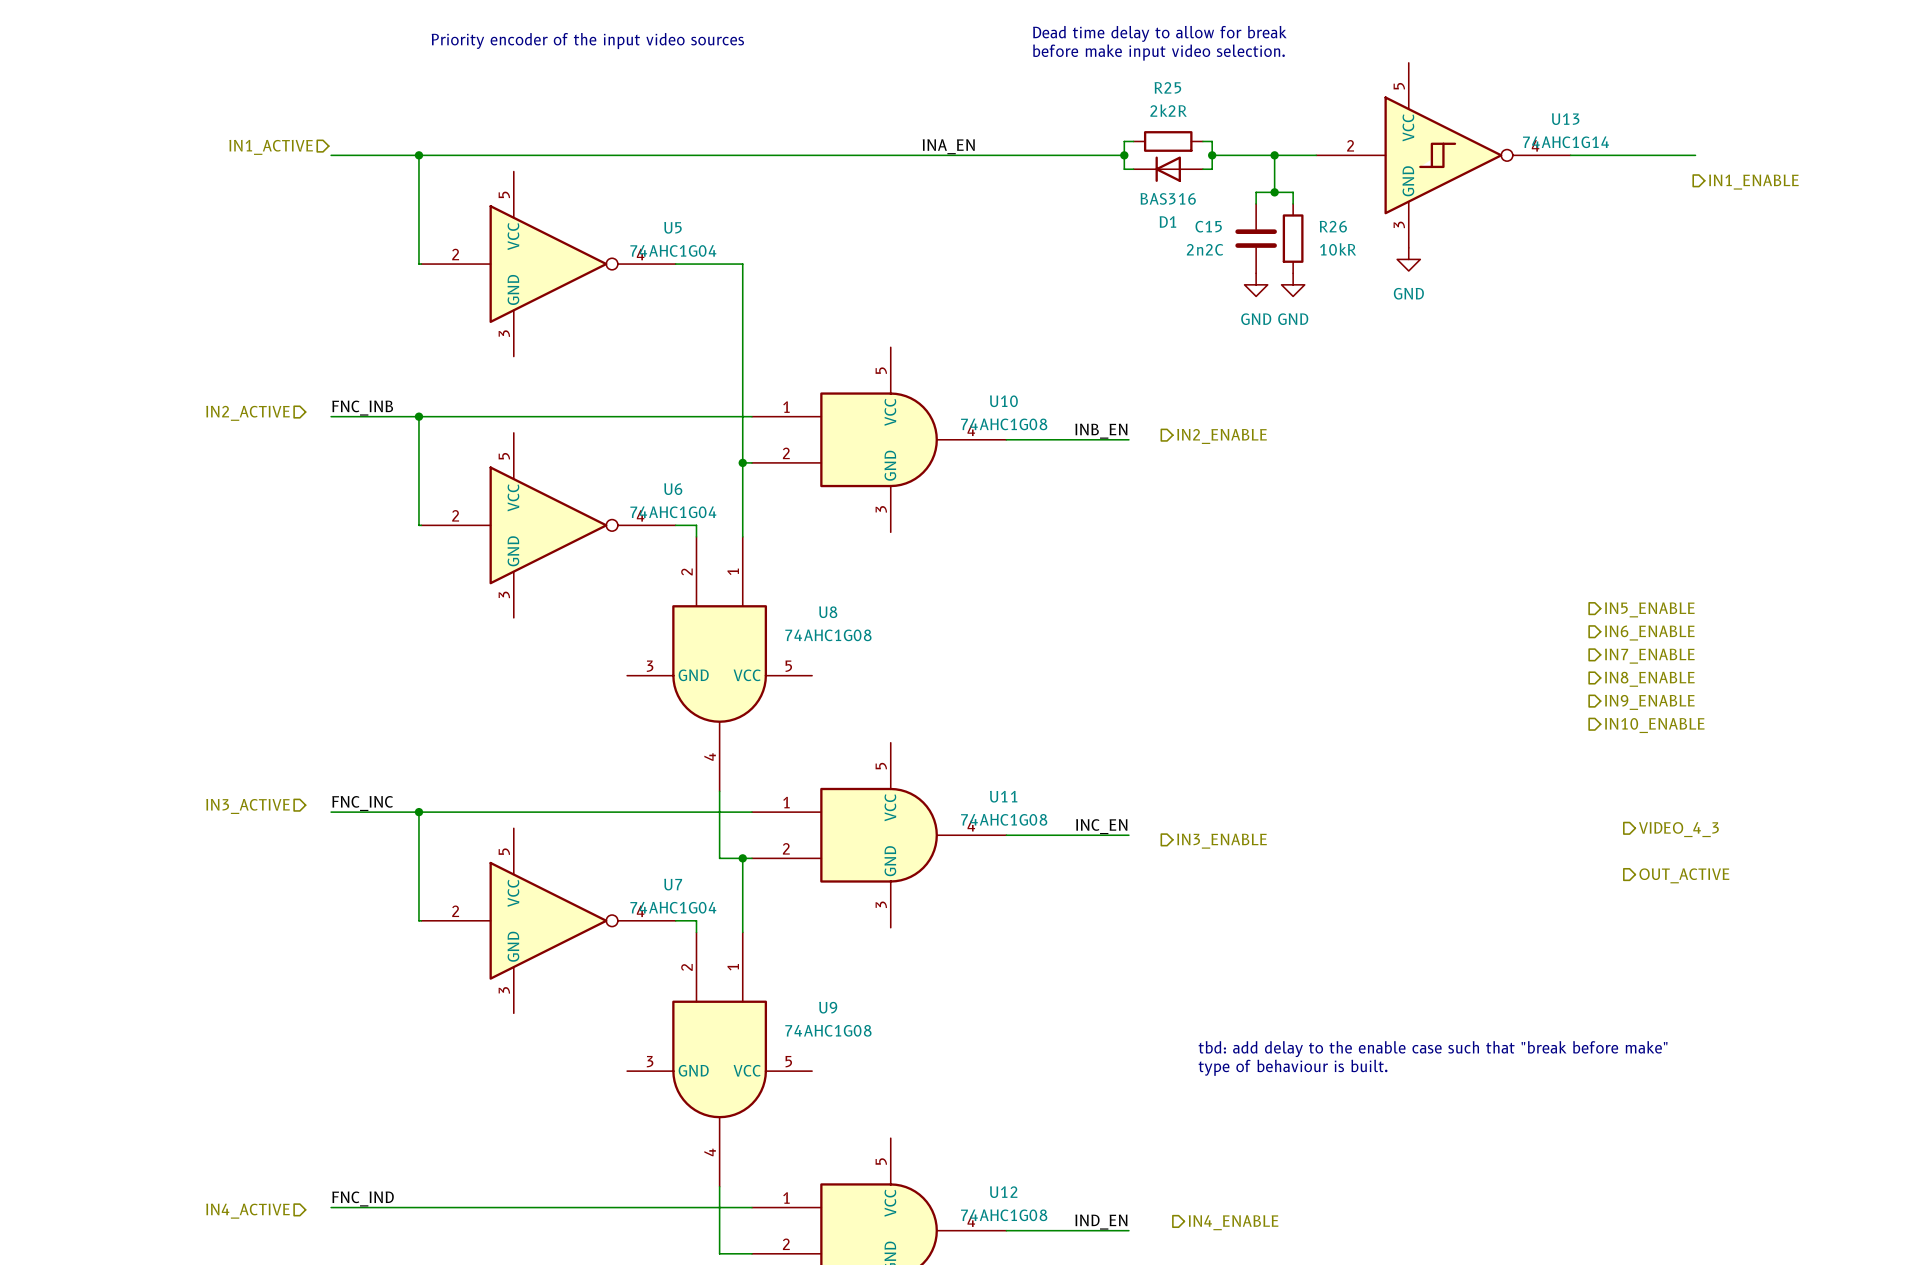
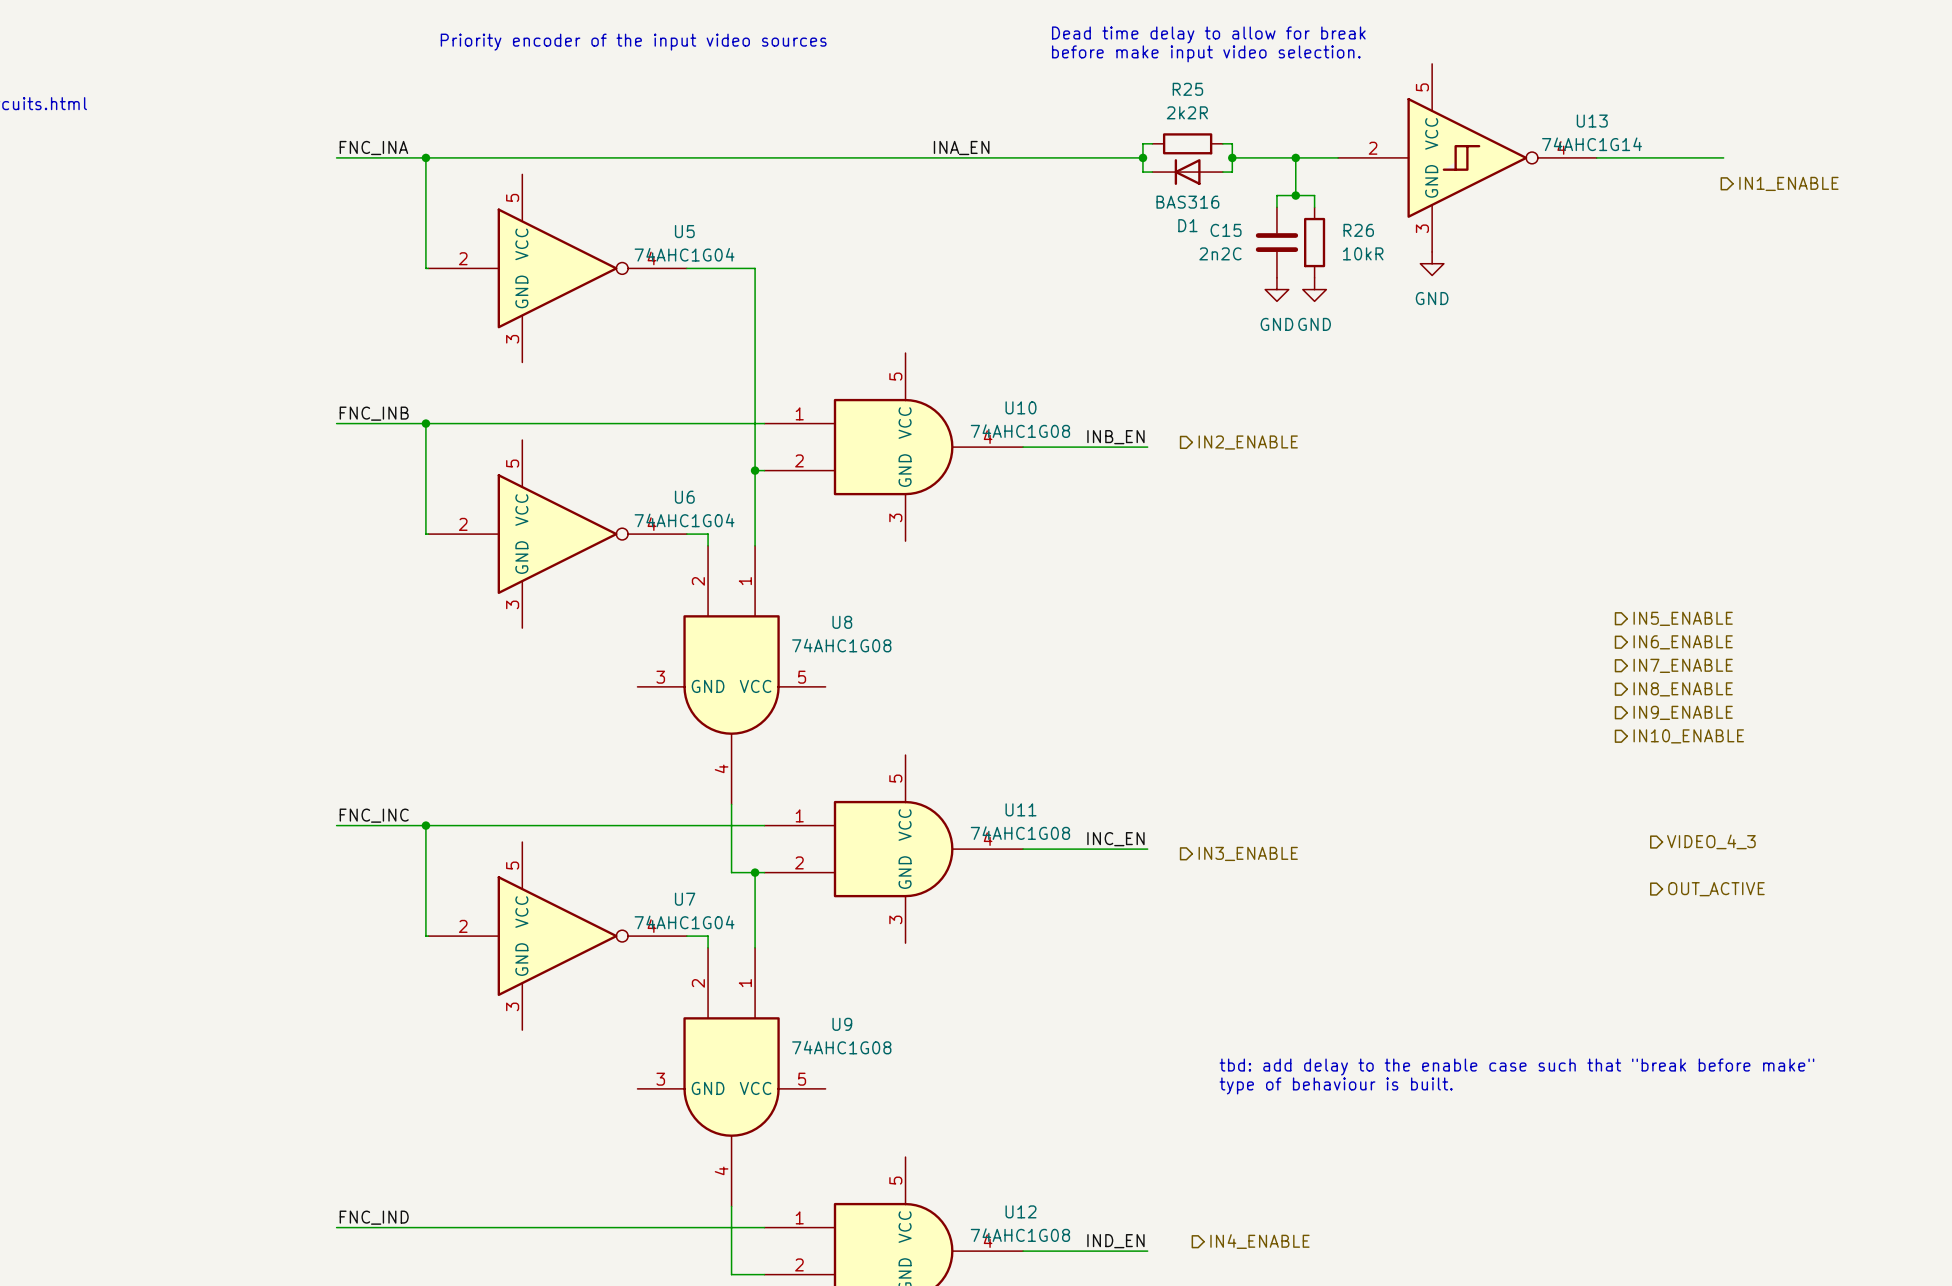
label: none -> FNC_INA (373, 148)
hierarchical label: IN1_ACTIVE (271, 147) -> none
hierarchical label: IN2_ACTIVE (248, 413) -> none
hierarchical label: IN3_ACTIVE (248, 806) -> none
hierarchical label: IN4_ACTIVE (248, 1211) -> none

